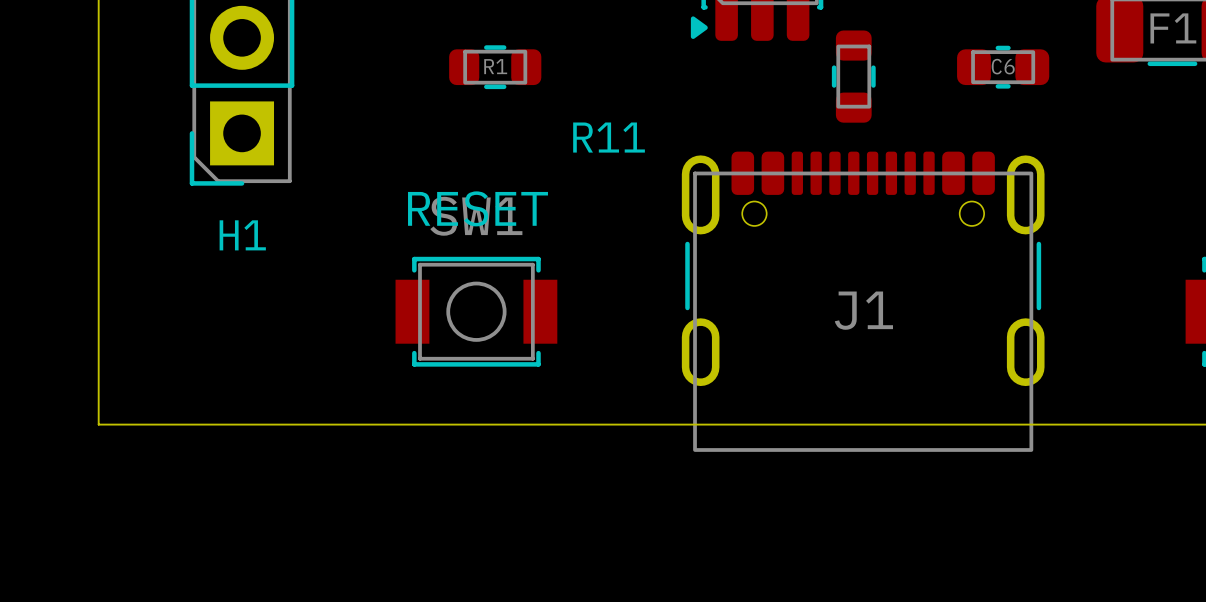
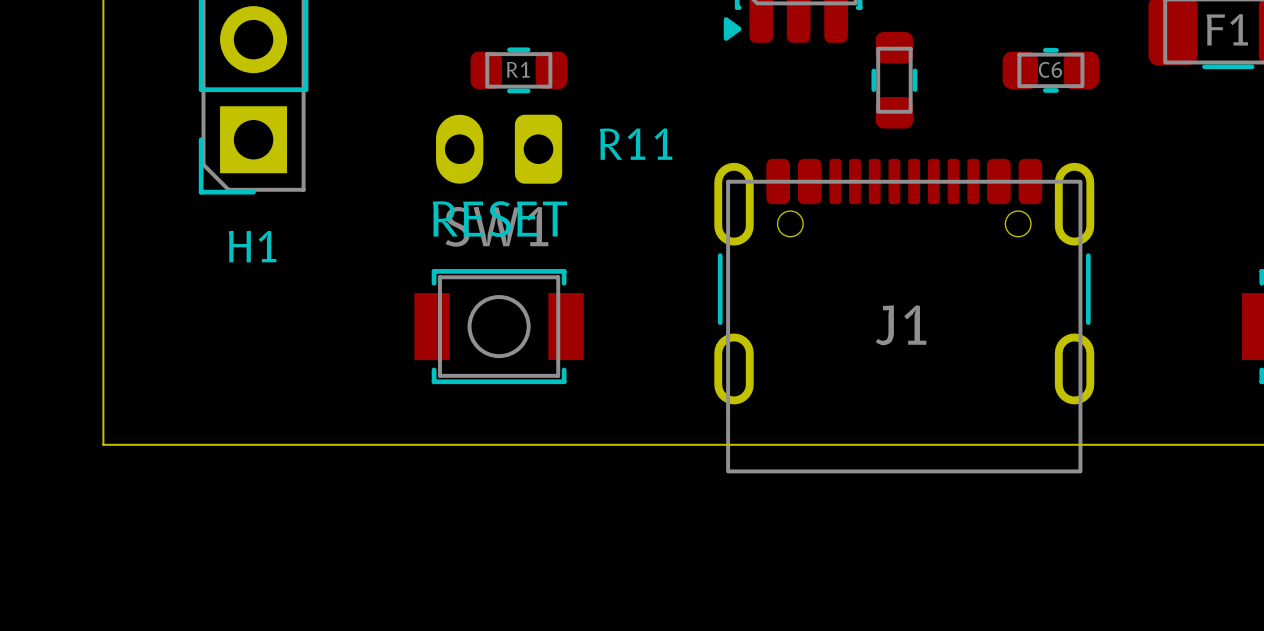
part: none -> (499, 149)

